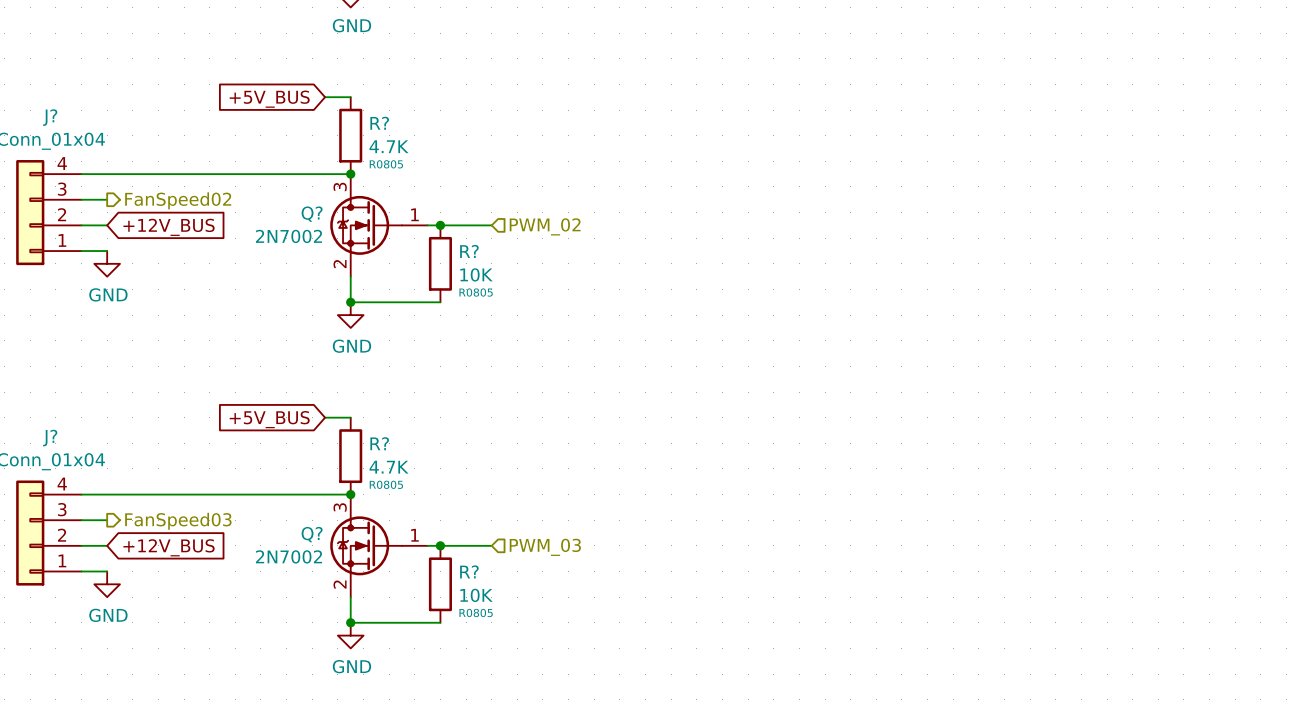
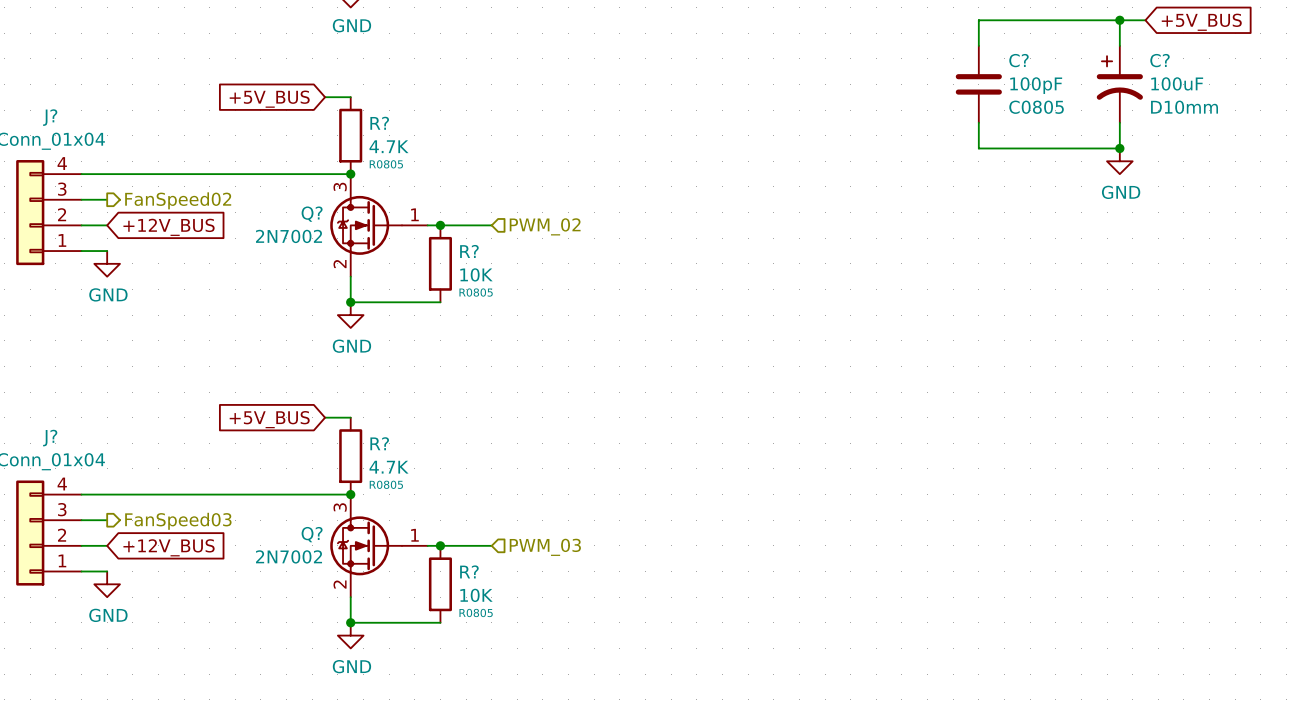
wire: none -> (1119, 20) (1119, 45)
junction: none -> (1119, 20)
wire: none -> (1145, 20) (978, 20) (978, 45)
global label: none -> +5V_BUS (1201, 22)
C?: none -> 100pF (978, 84)
C?: none -> 100uF (1119, 84)
wire: none -> (978, 122) (978, 148) (1119, 148) (1119, 122)
junction: none -> (1119, 148)
power symbol: none -> GND (1119, 161)

